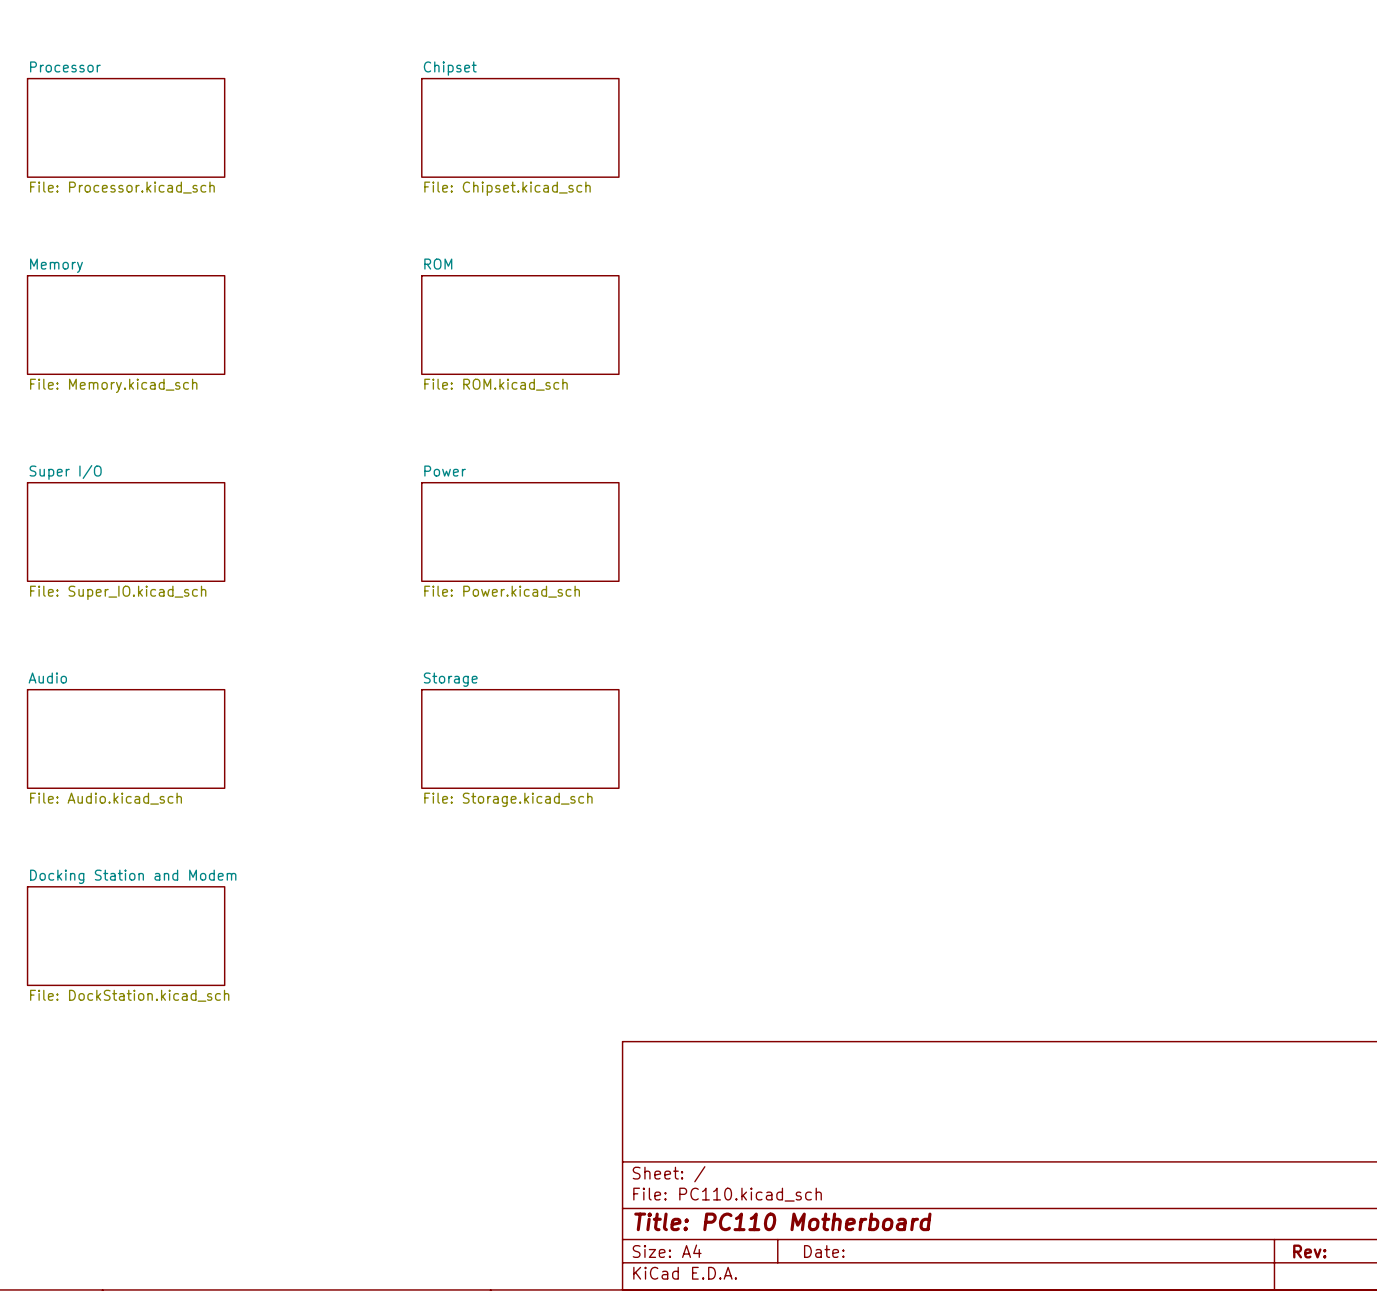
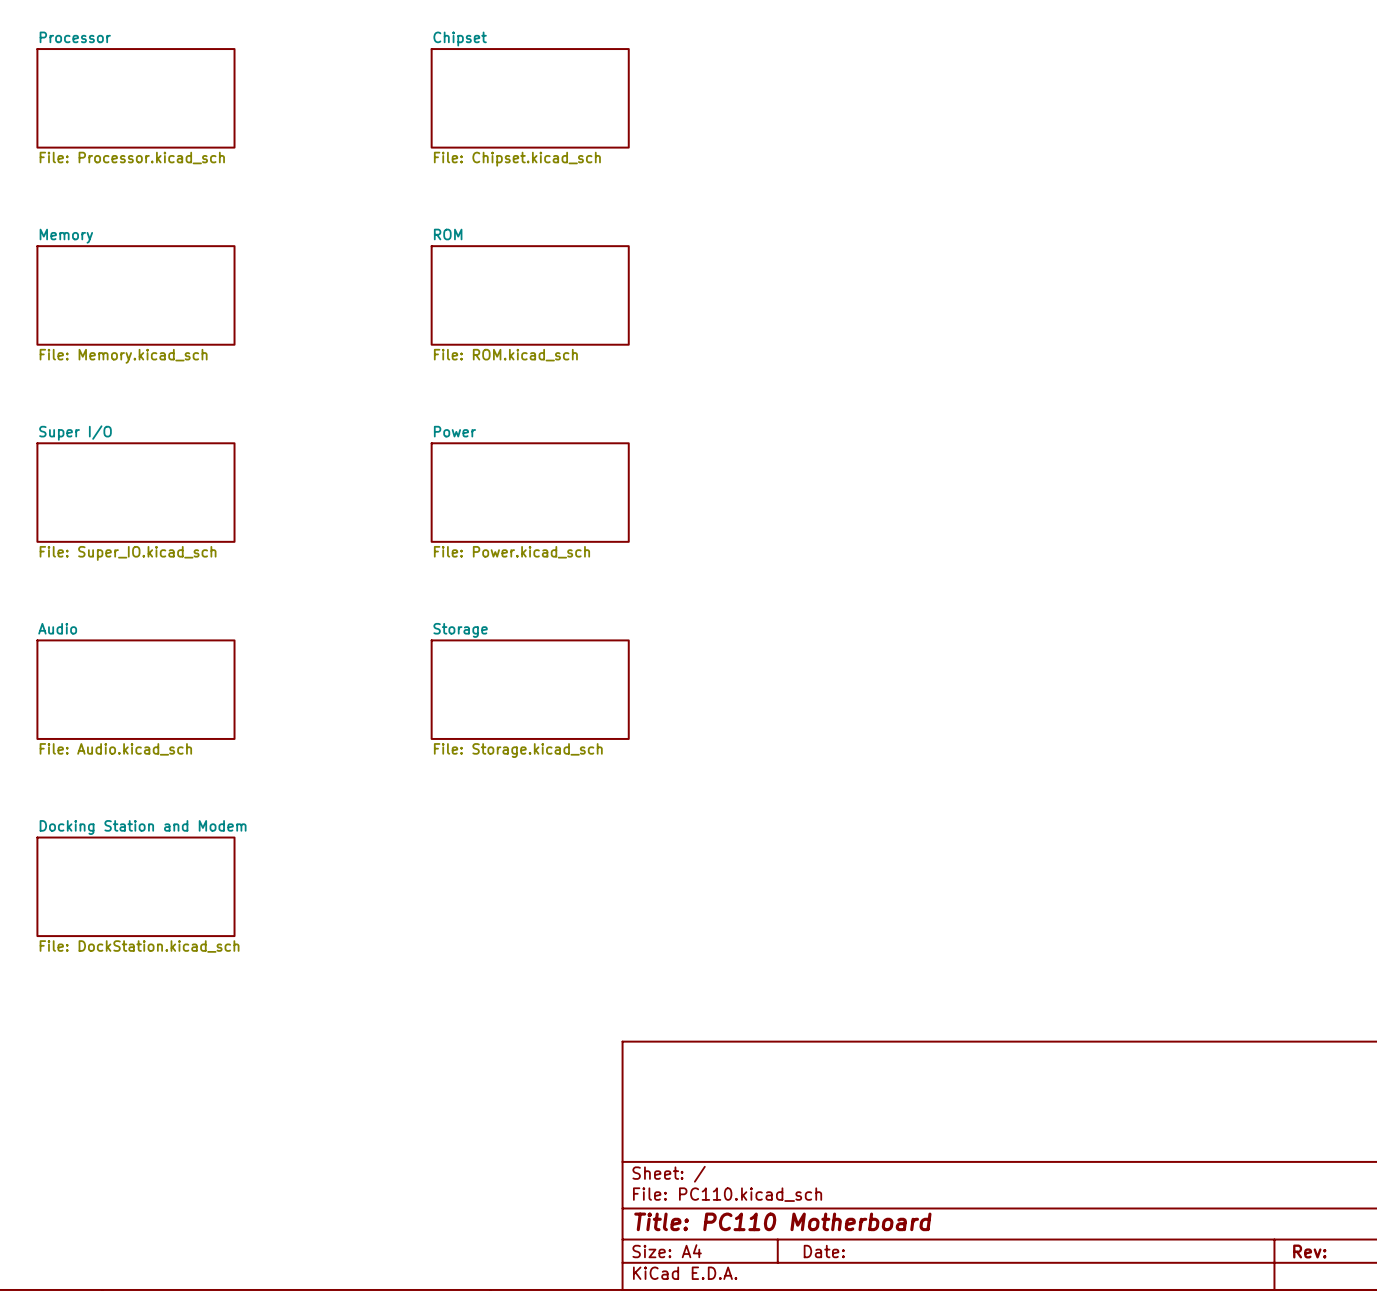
sheet Processor position: (126, 127) -> (135, 98)
sheet Chipset position: (520, 127) -> (530, 98)
sheet Memory position: (126, 325) -> (135, 295)
sheet ROM position: (520, 325) -> (530, 295)
sheet Super I/O position: (126, 531) -> (135, 492)
sheet Power position: (520, 531) -> (530, 492)
sheet Audio position: (126, 738) -> (135, 689)
sheet Storage position: (520, 738) -> (530, 689)
sheet Docking Station and Modem position: (126, 936) -> (135, 886)

